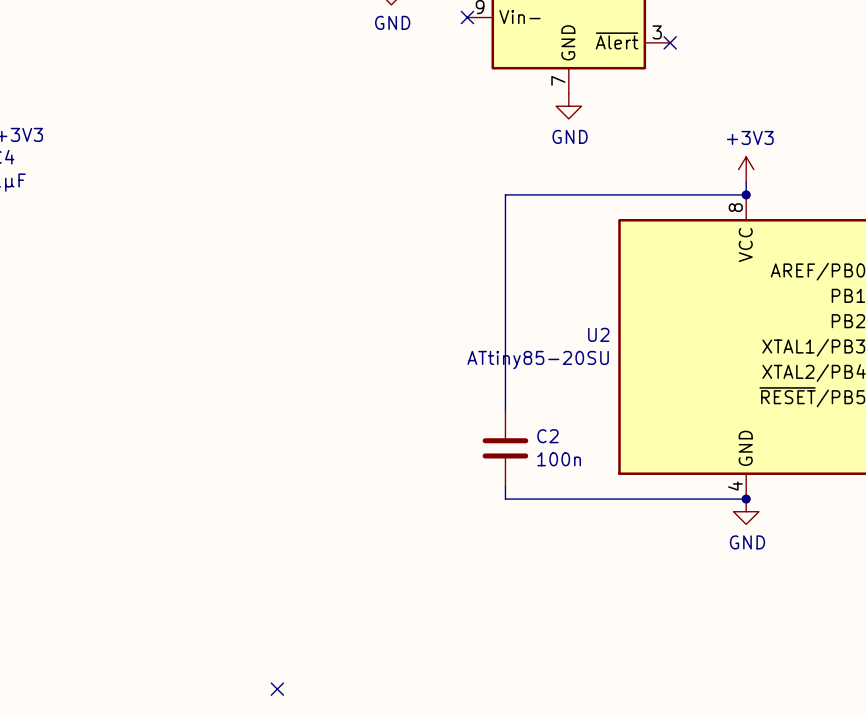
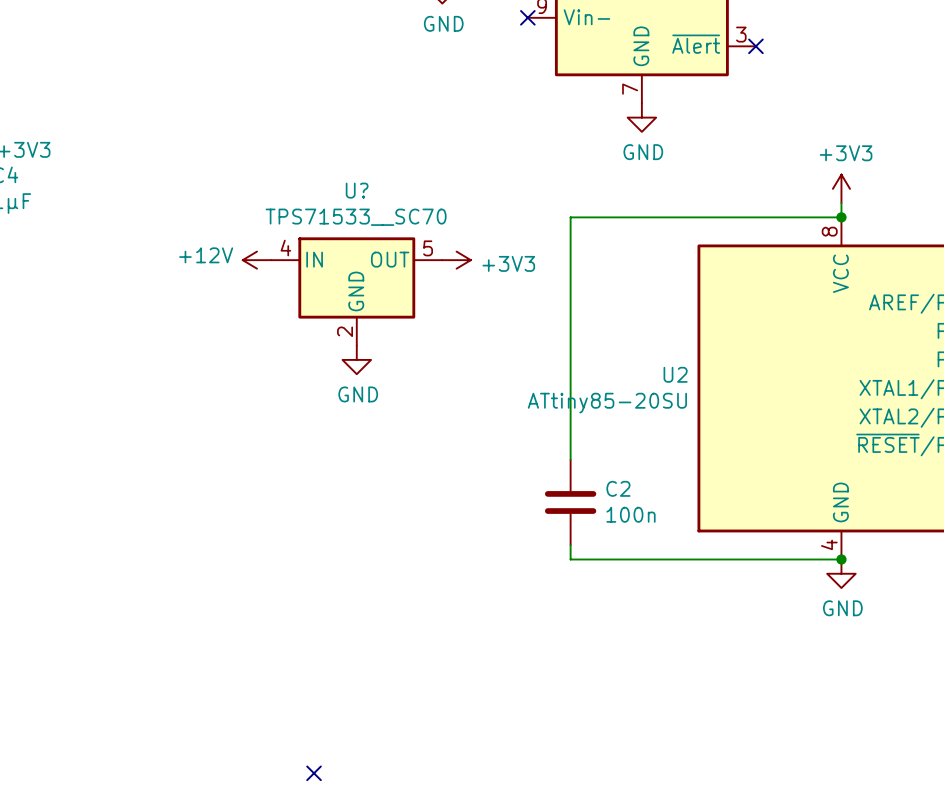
power symbol: none -> +12V (257, 260)
power symbol: none -> +3V3 (456, 260)
U?: none -> TPS71533__SC70 (356, 291)
power symbol: none -> GND (356, 359)

